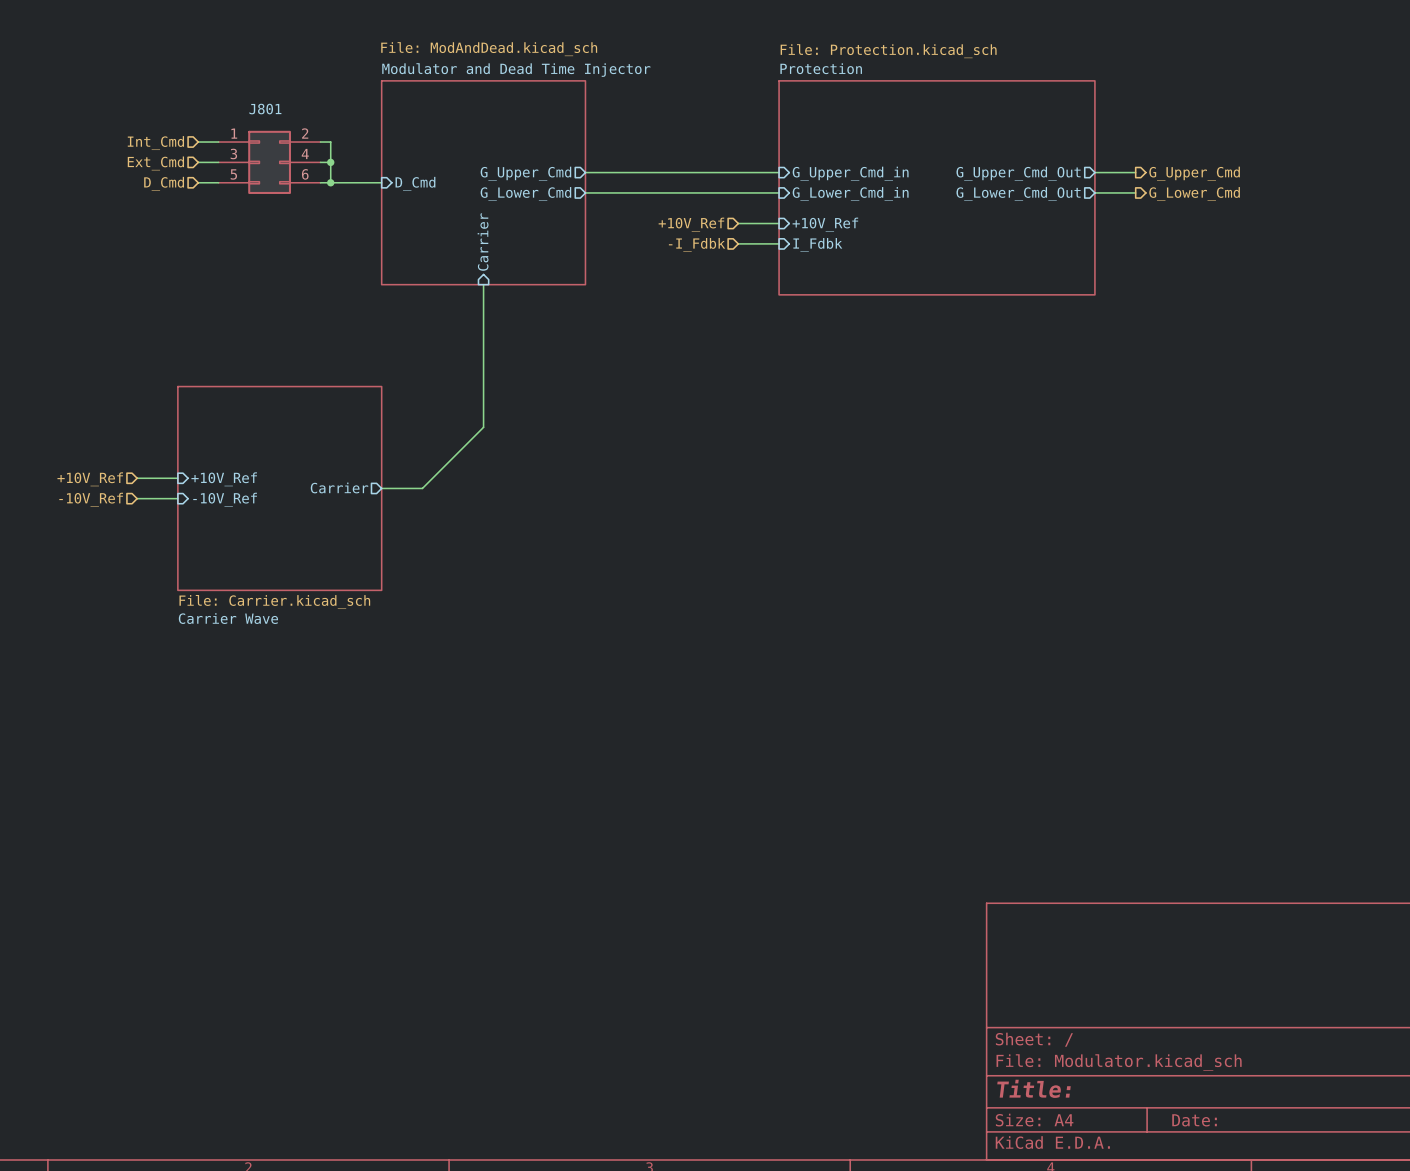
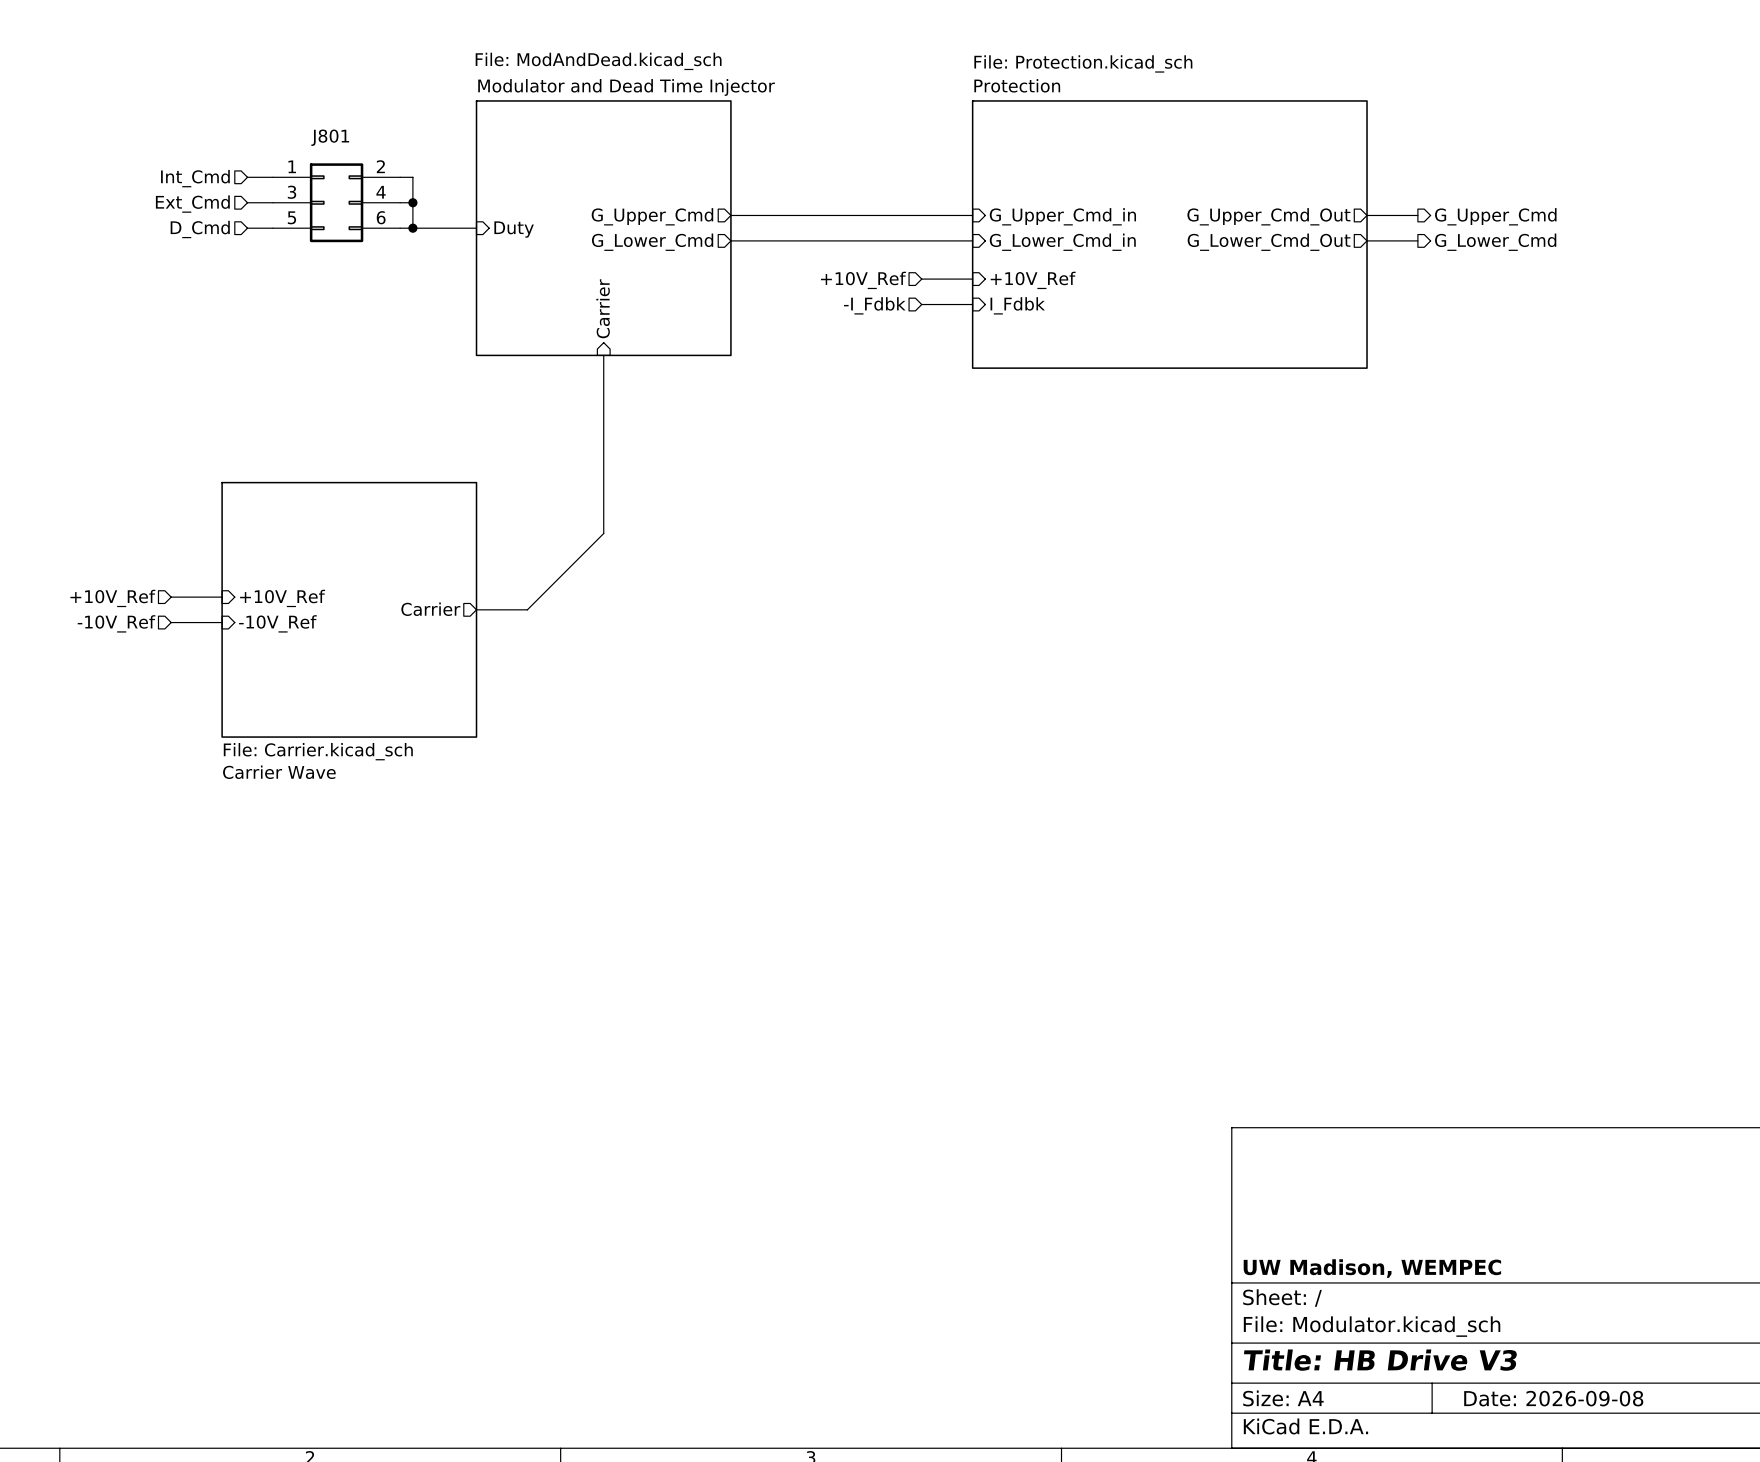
sheet pin: D_Cmd (415, 183) -> Duty (514, 229)
title block: none -> UW Madison, WEMPEC (1372, 1268)
title block: Title: (1034, 1088) -> Title: HB Drive V3 (1380, 1360)
title block: Date: (1194, 1120) -> Date: 2026-09-08 (1553, 1398)

